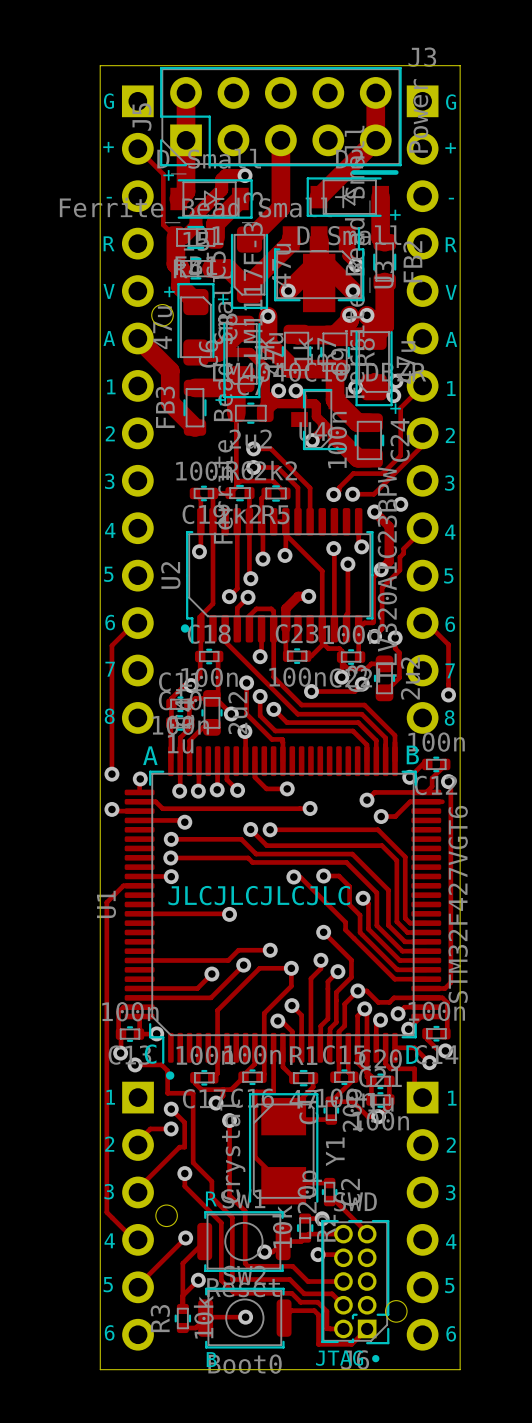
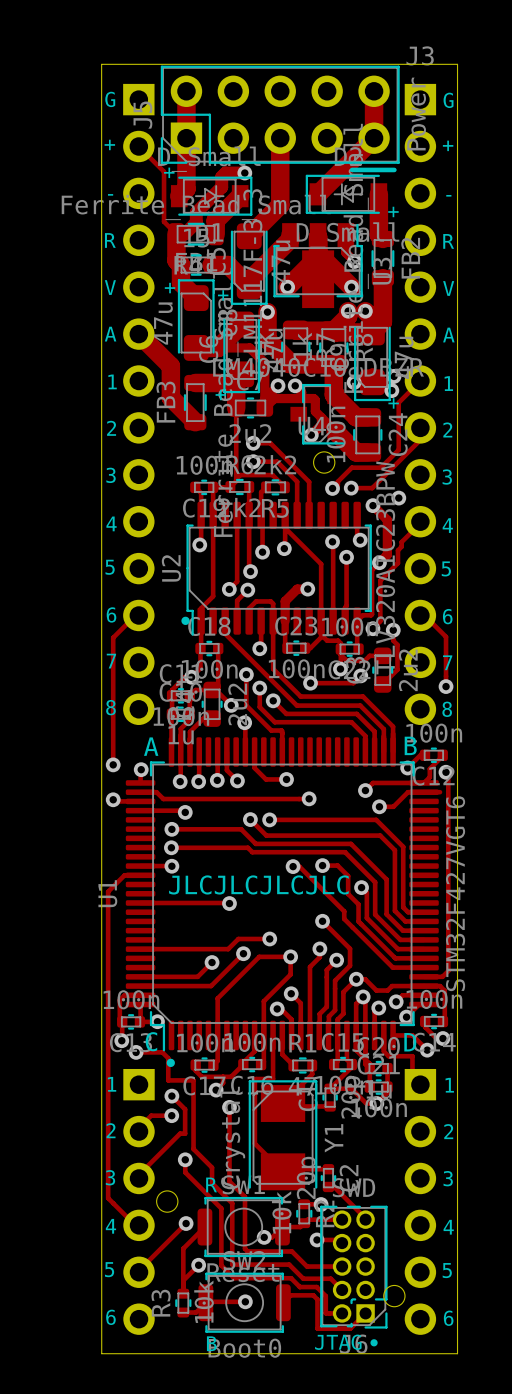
round board edge position: (162, 315) -> (324, 462)

